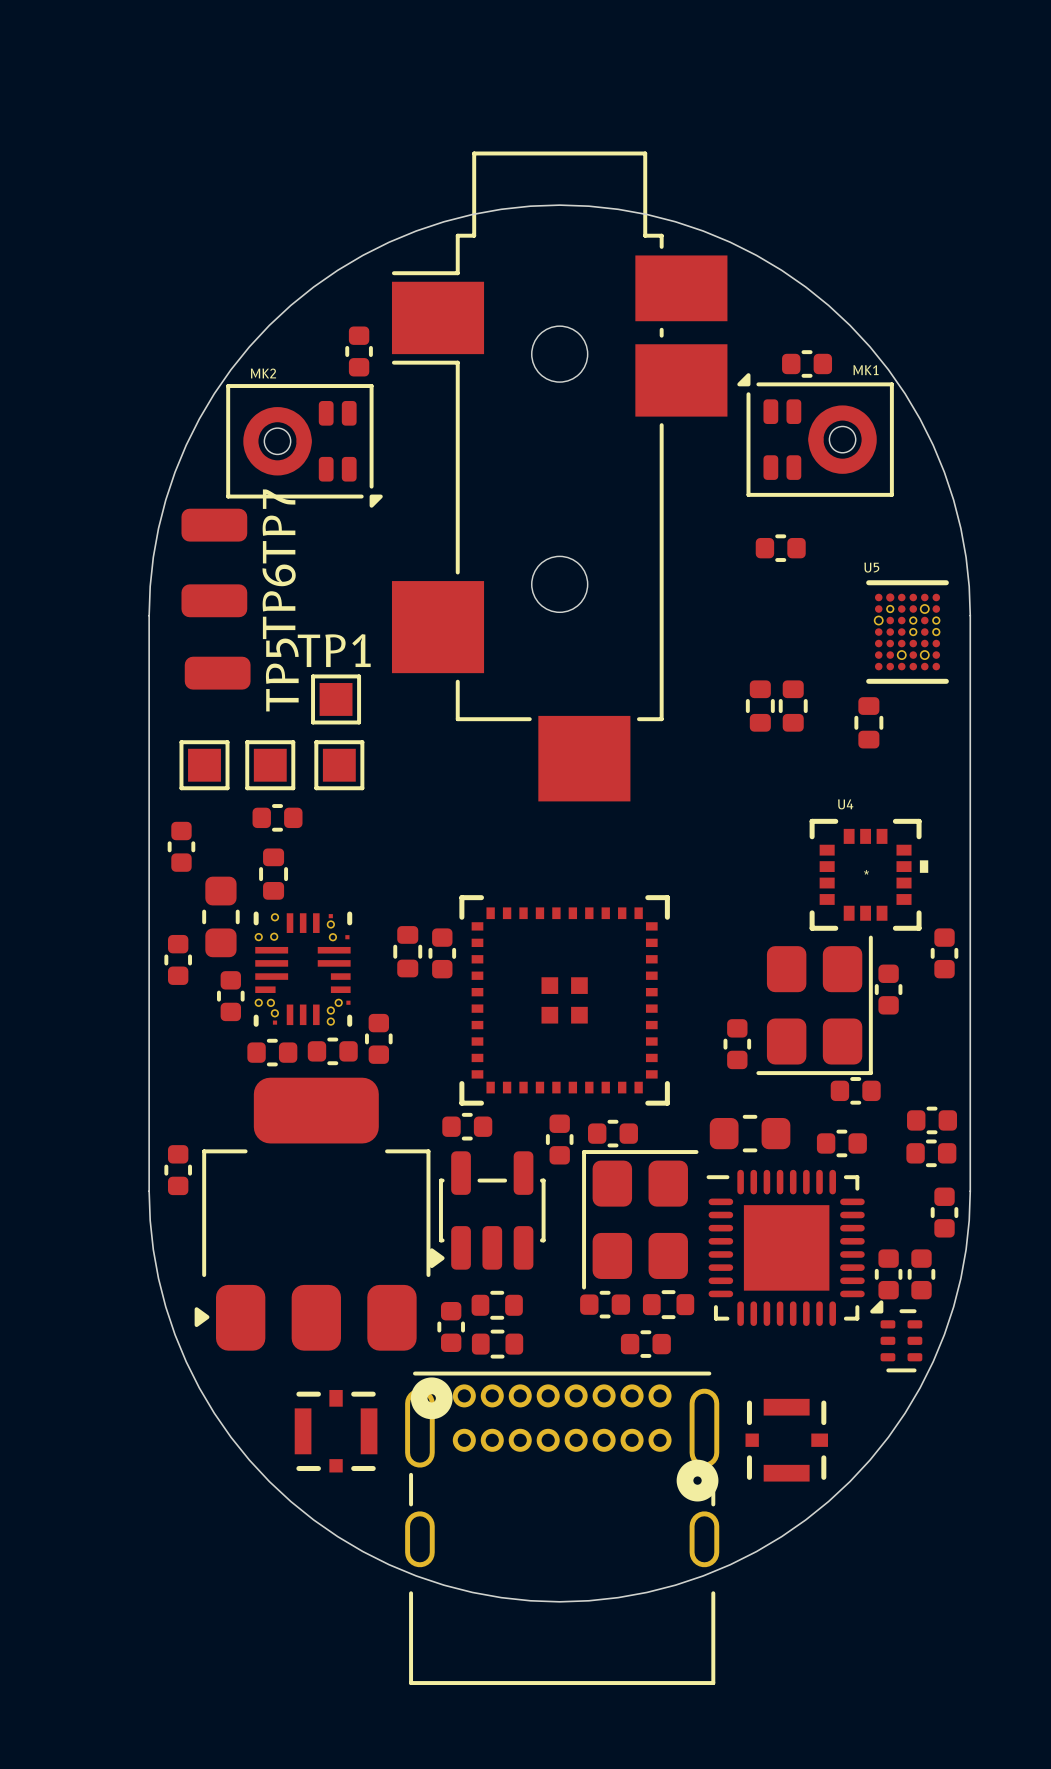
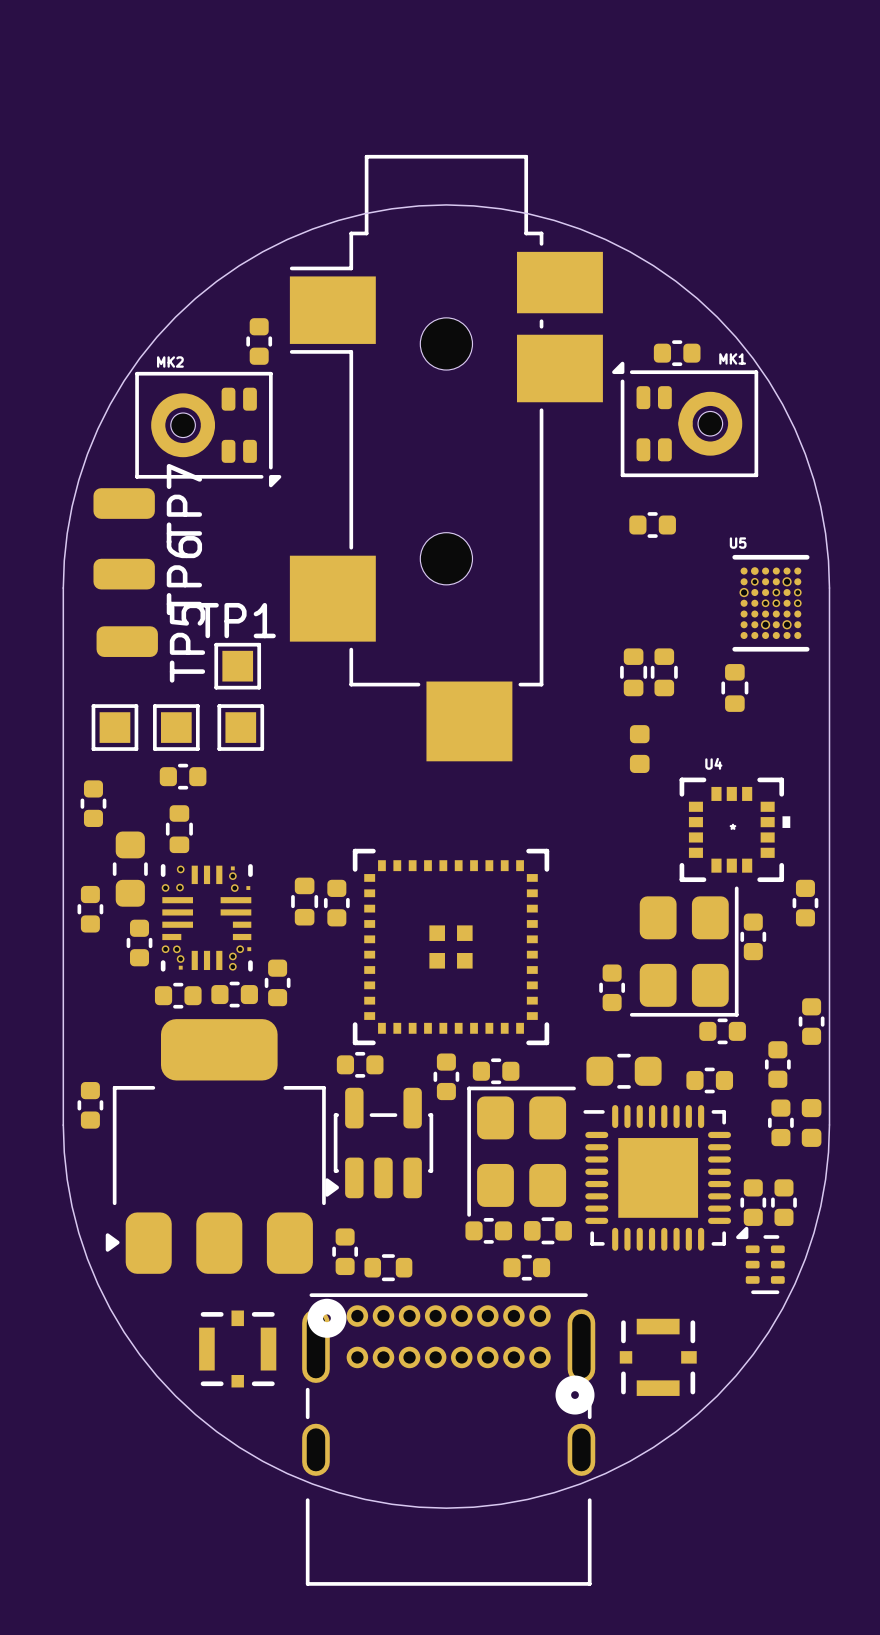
U5 footprint: [866, 580, 949, 684] -> [732, 554, 810, 652]
part: none -> (639, 749)
part: none -> (811, 1021)
part: (932, 1120) -> none
part: none -> (777, 1064)
part: (931, 1153) -> none
part: none -> (780, 1122)
part: none -> (811, 1122)
part: (944, 1212) -> none
part: (497, 1305) -> none

